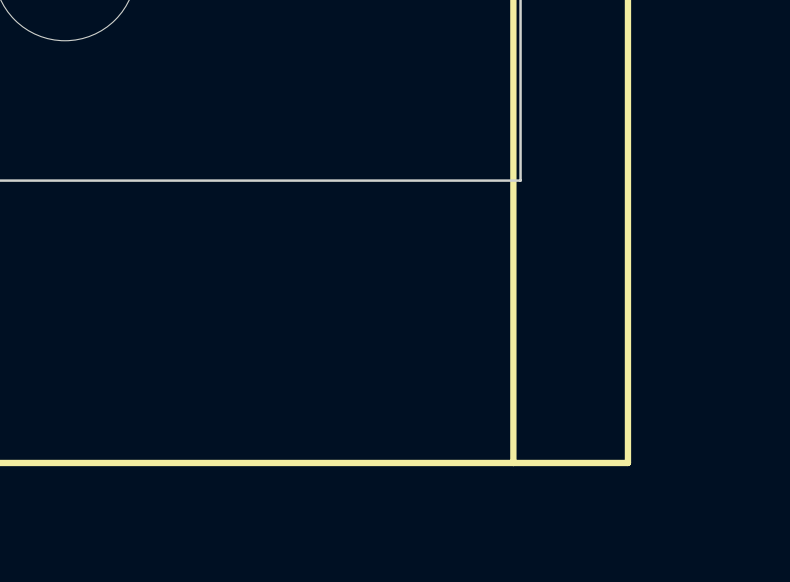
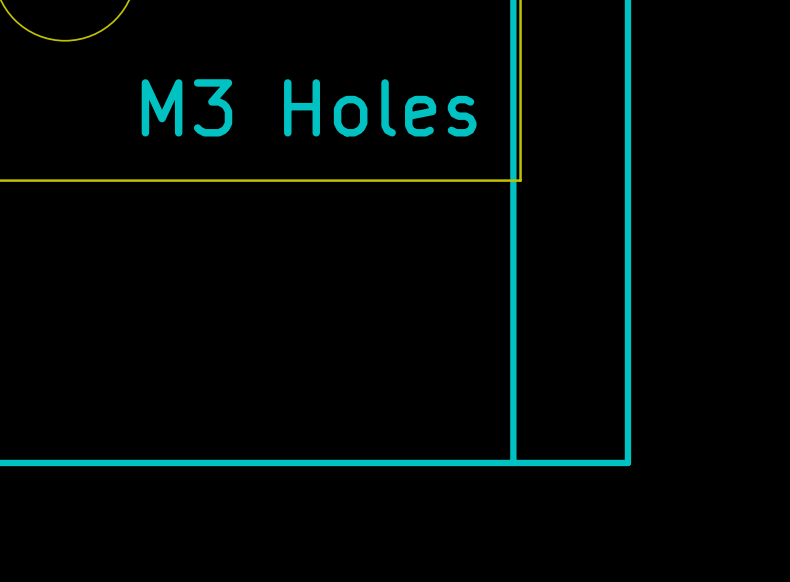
text: none -> M3 Holes (309, 107)

